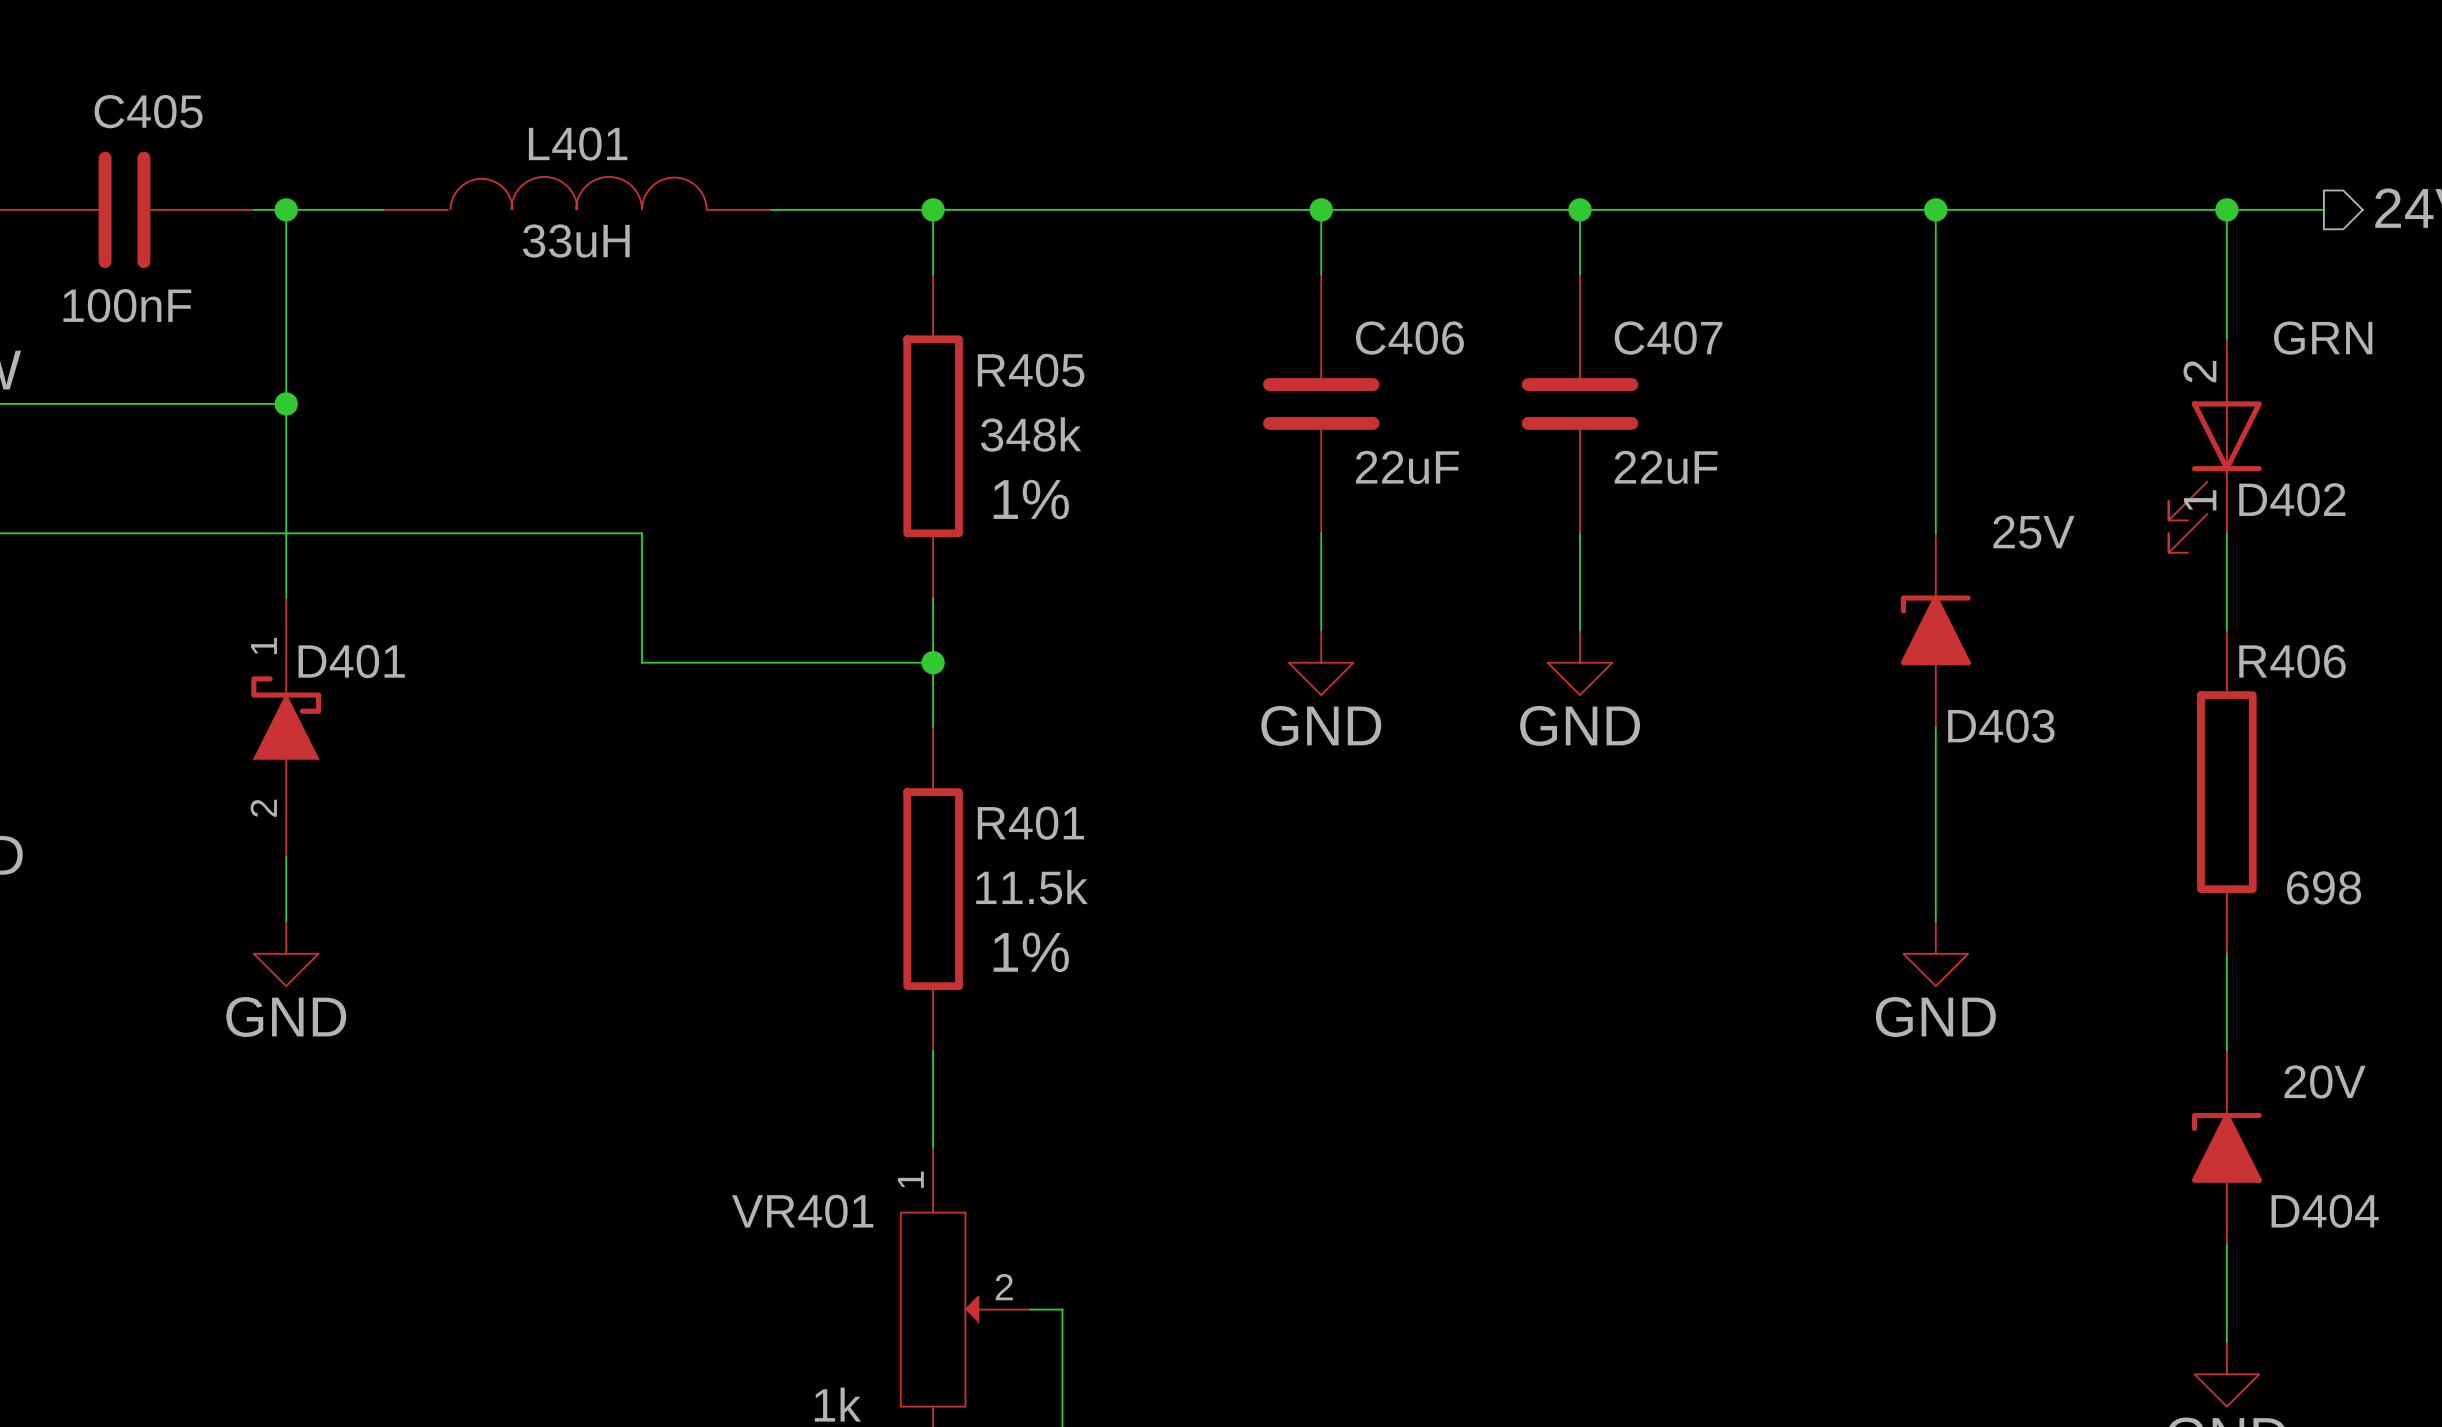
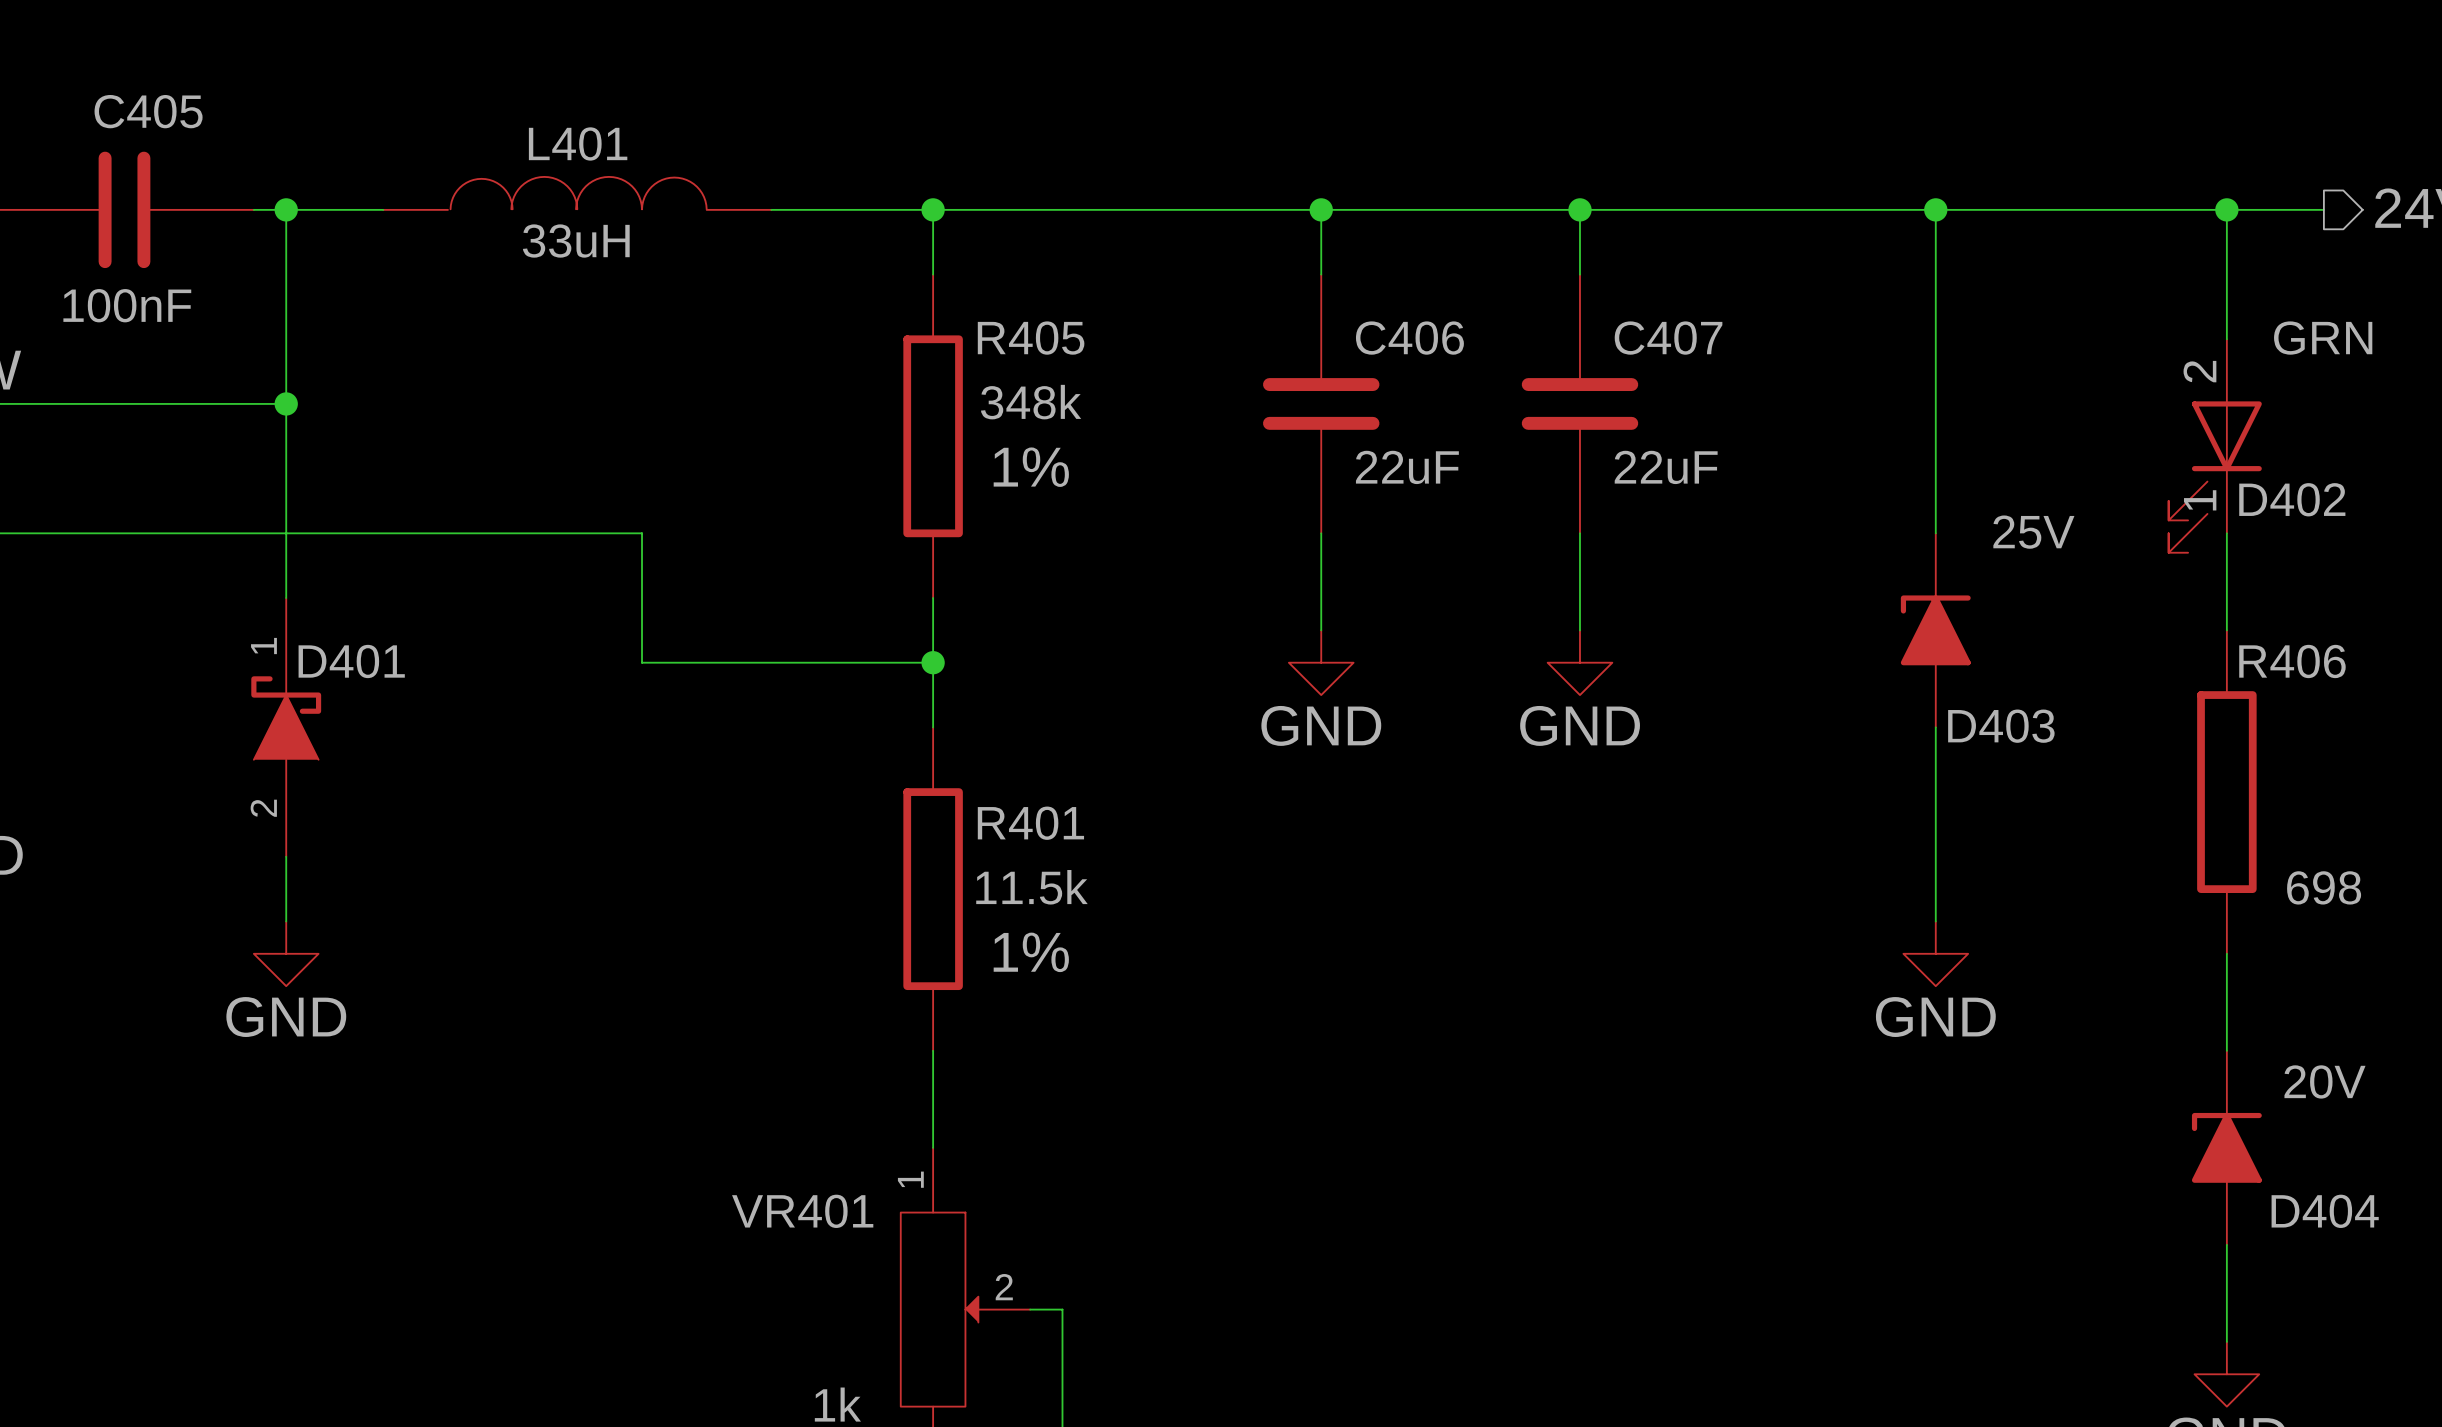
R405 name position: R405 (1031, 370) -> R405 (1031, 338)
R405 value position: 348k (1031, 434) -> 348k (1031, 402)
R405 text position: 1% (1031, 499) -> 1% (1031, 467)

